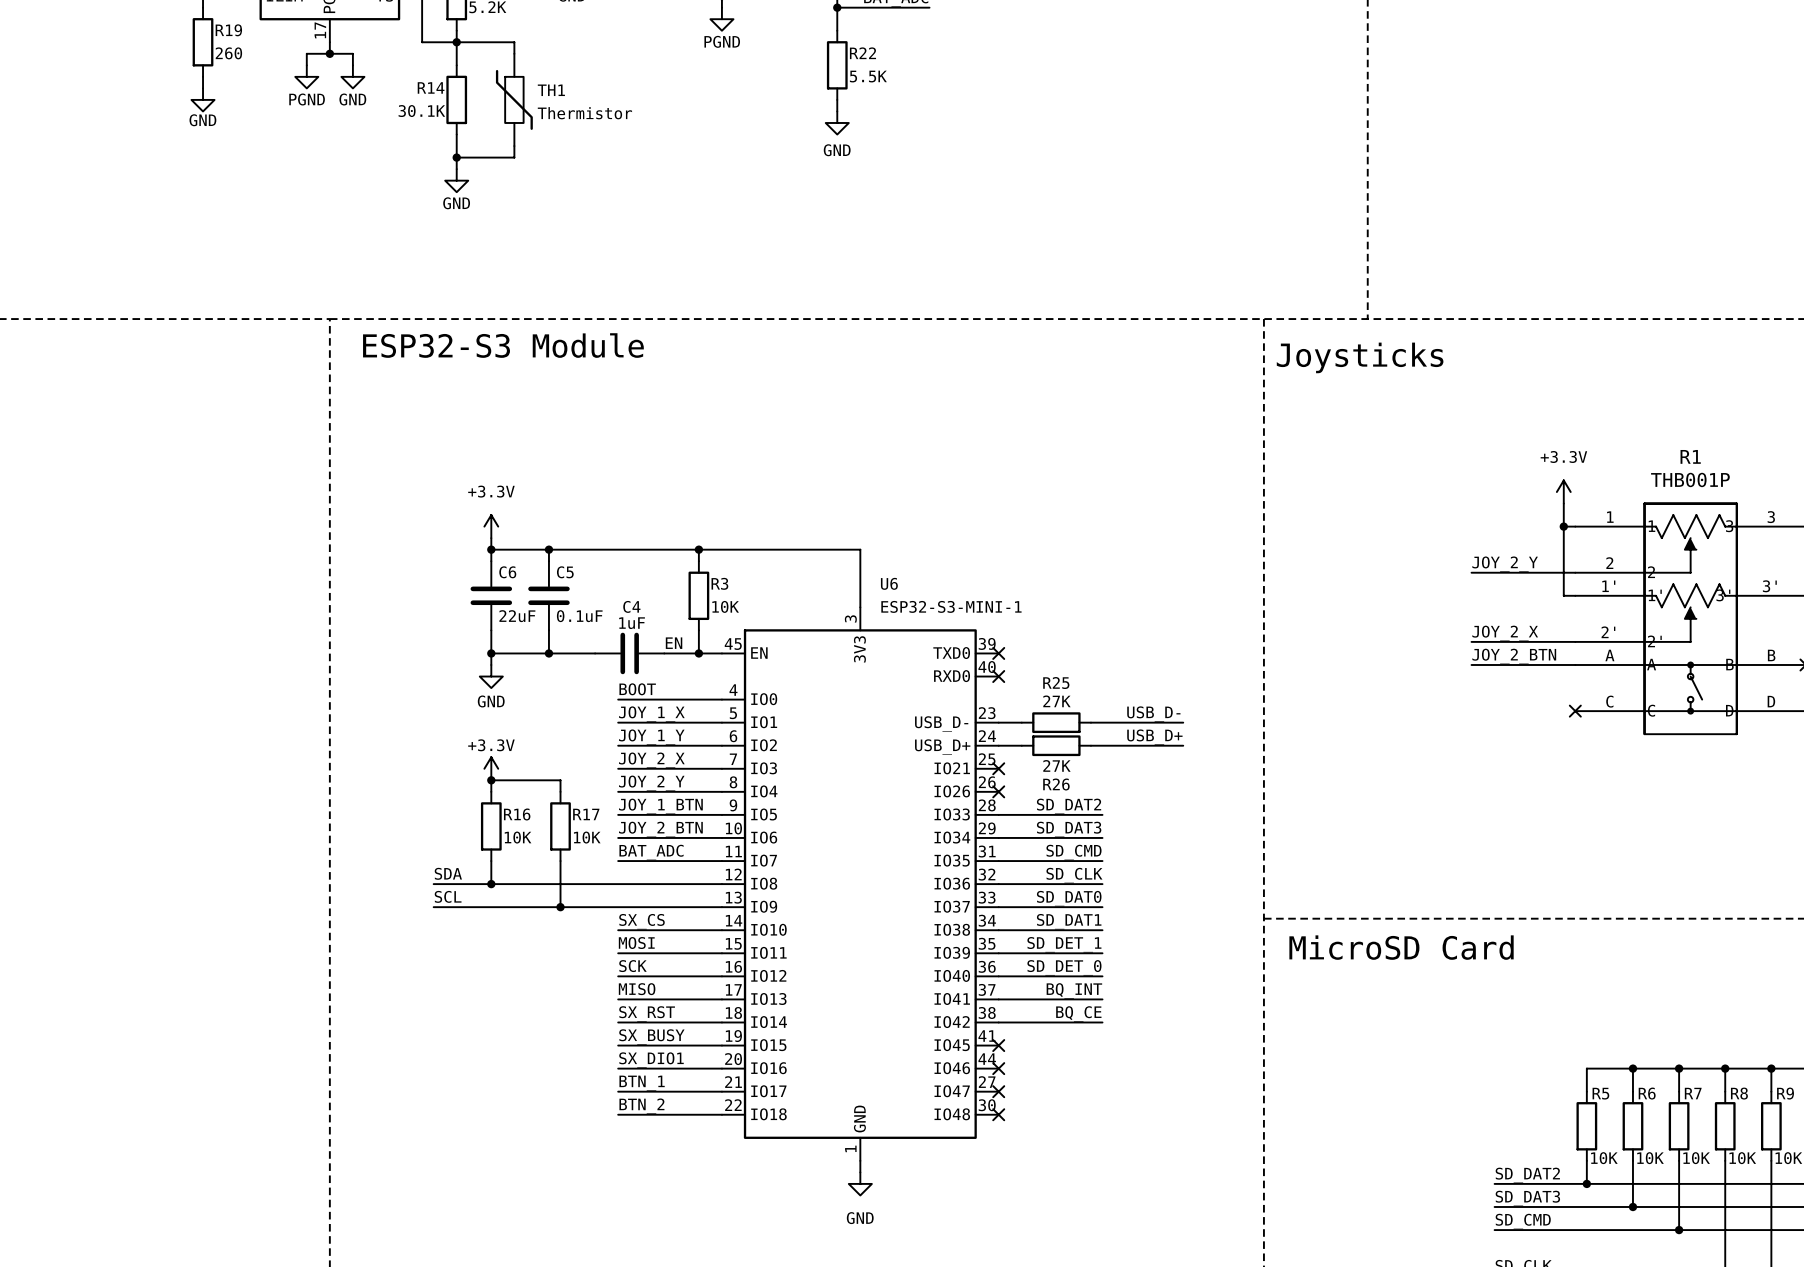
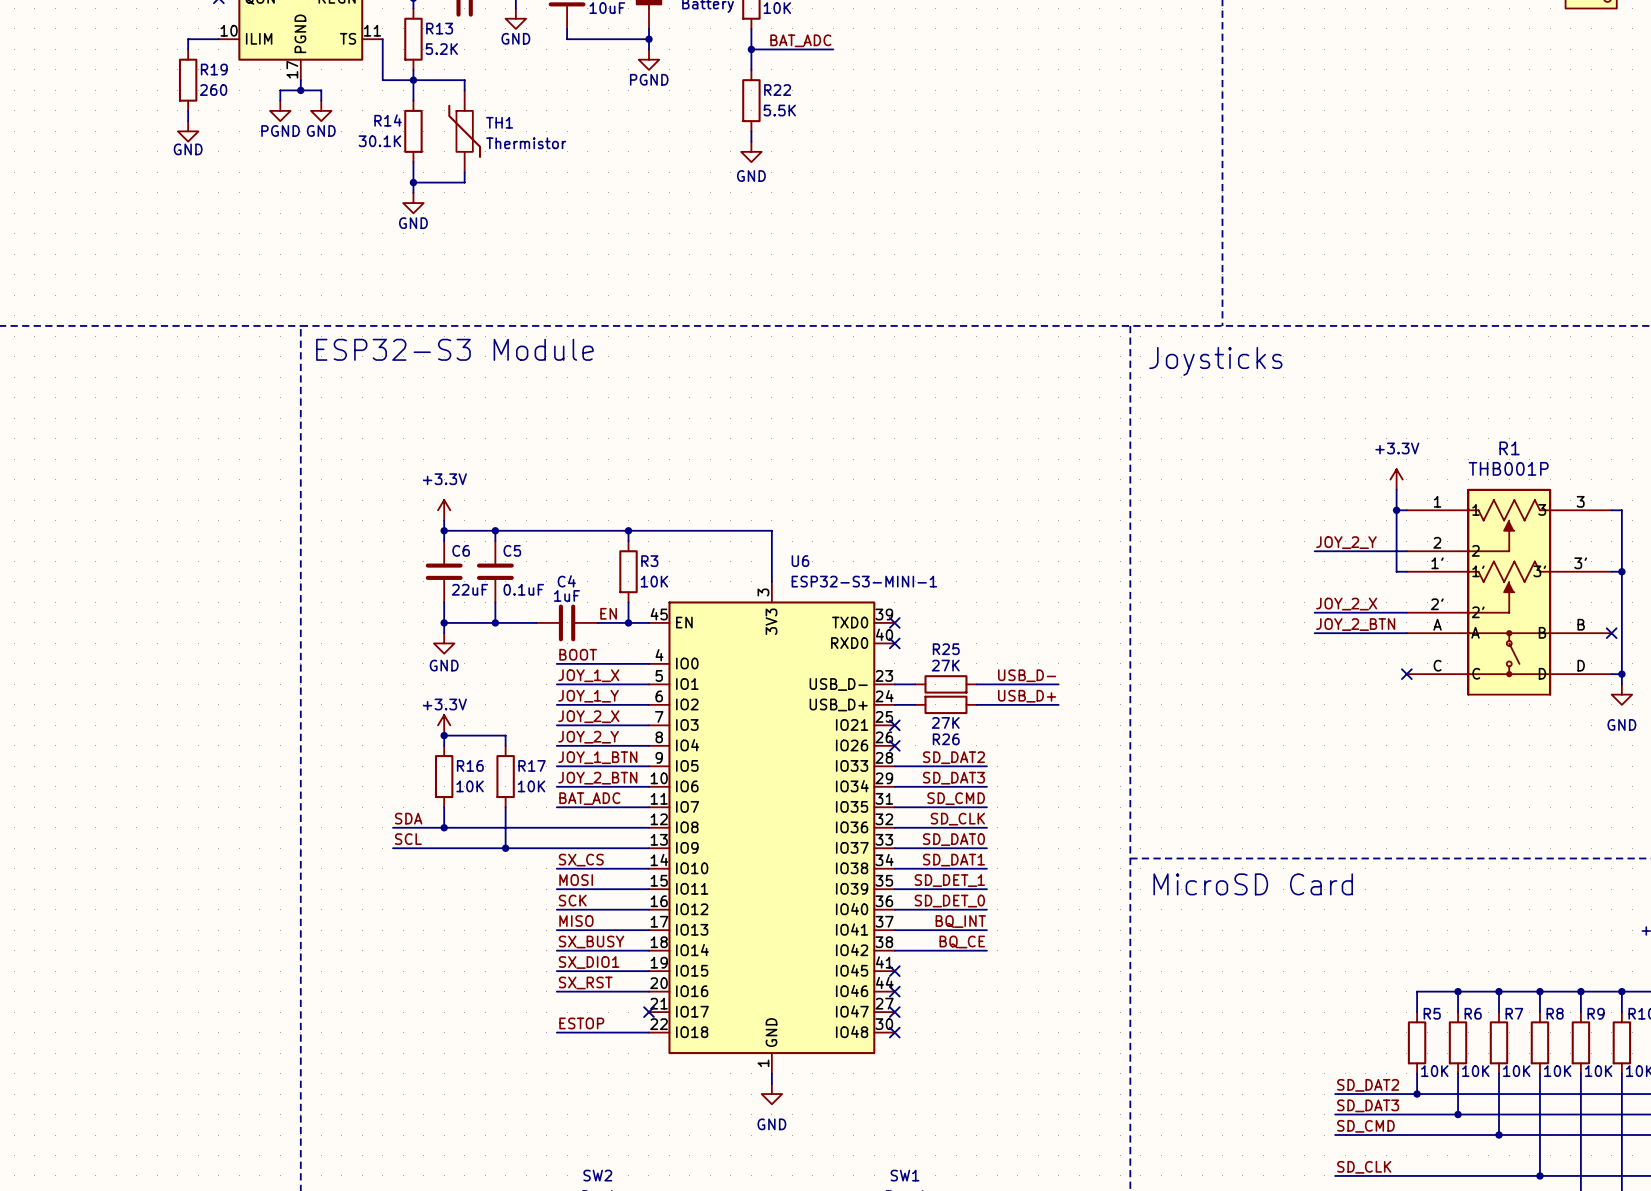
label: SX_RST (647, 1013) -> SX_BUSY (591, 942)
label: SX_BUSY (651, 1037) -> SX_DIO1 (589, 962)
label: SX_DIO1 (651, 1060) -> SX_RST (585, 982)
label: BTN_1 (642, 1083) -> none
wire: (618, 1091) (721, 1091) -> none
no-connect mark: none -> (648, 1012)
label: BTN_2 (641, 1106) -> ESTOP (581, 1023)

